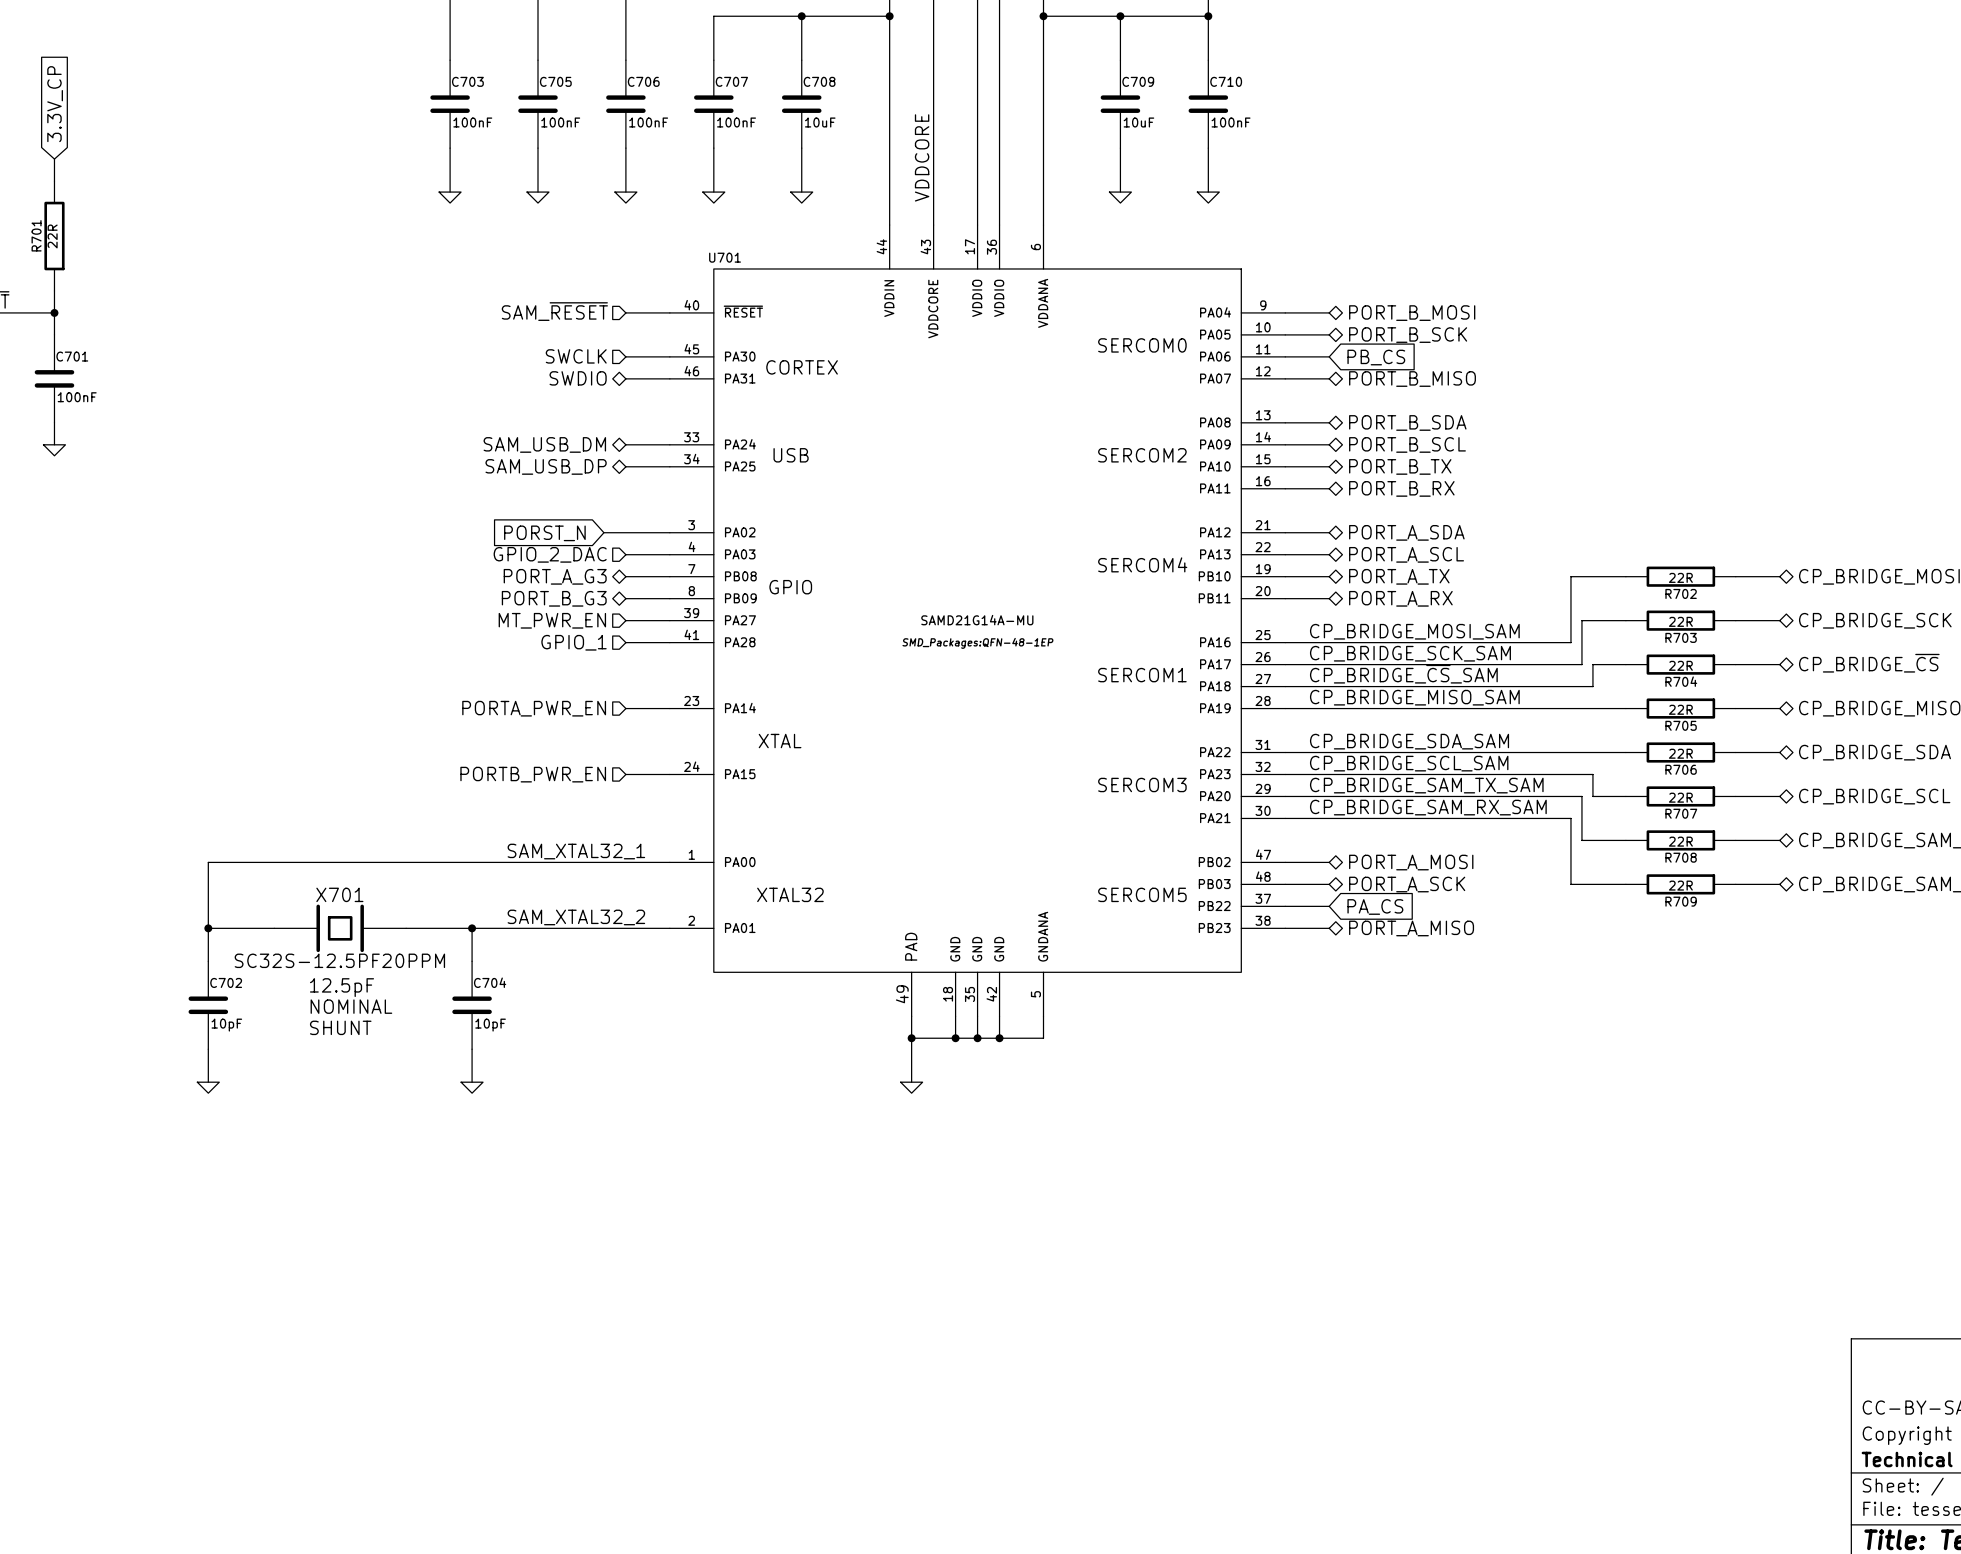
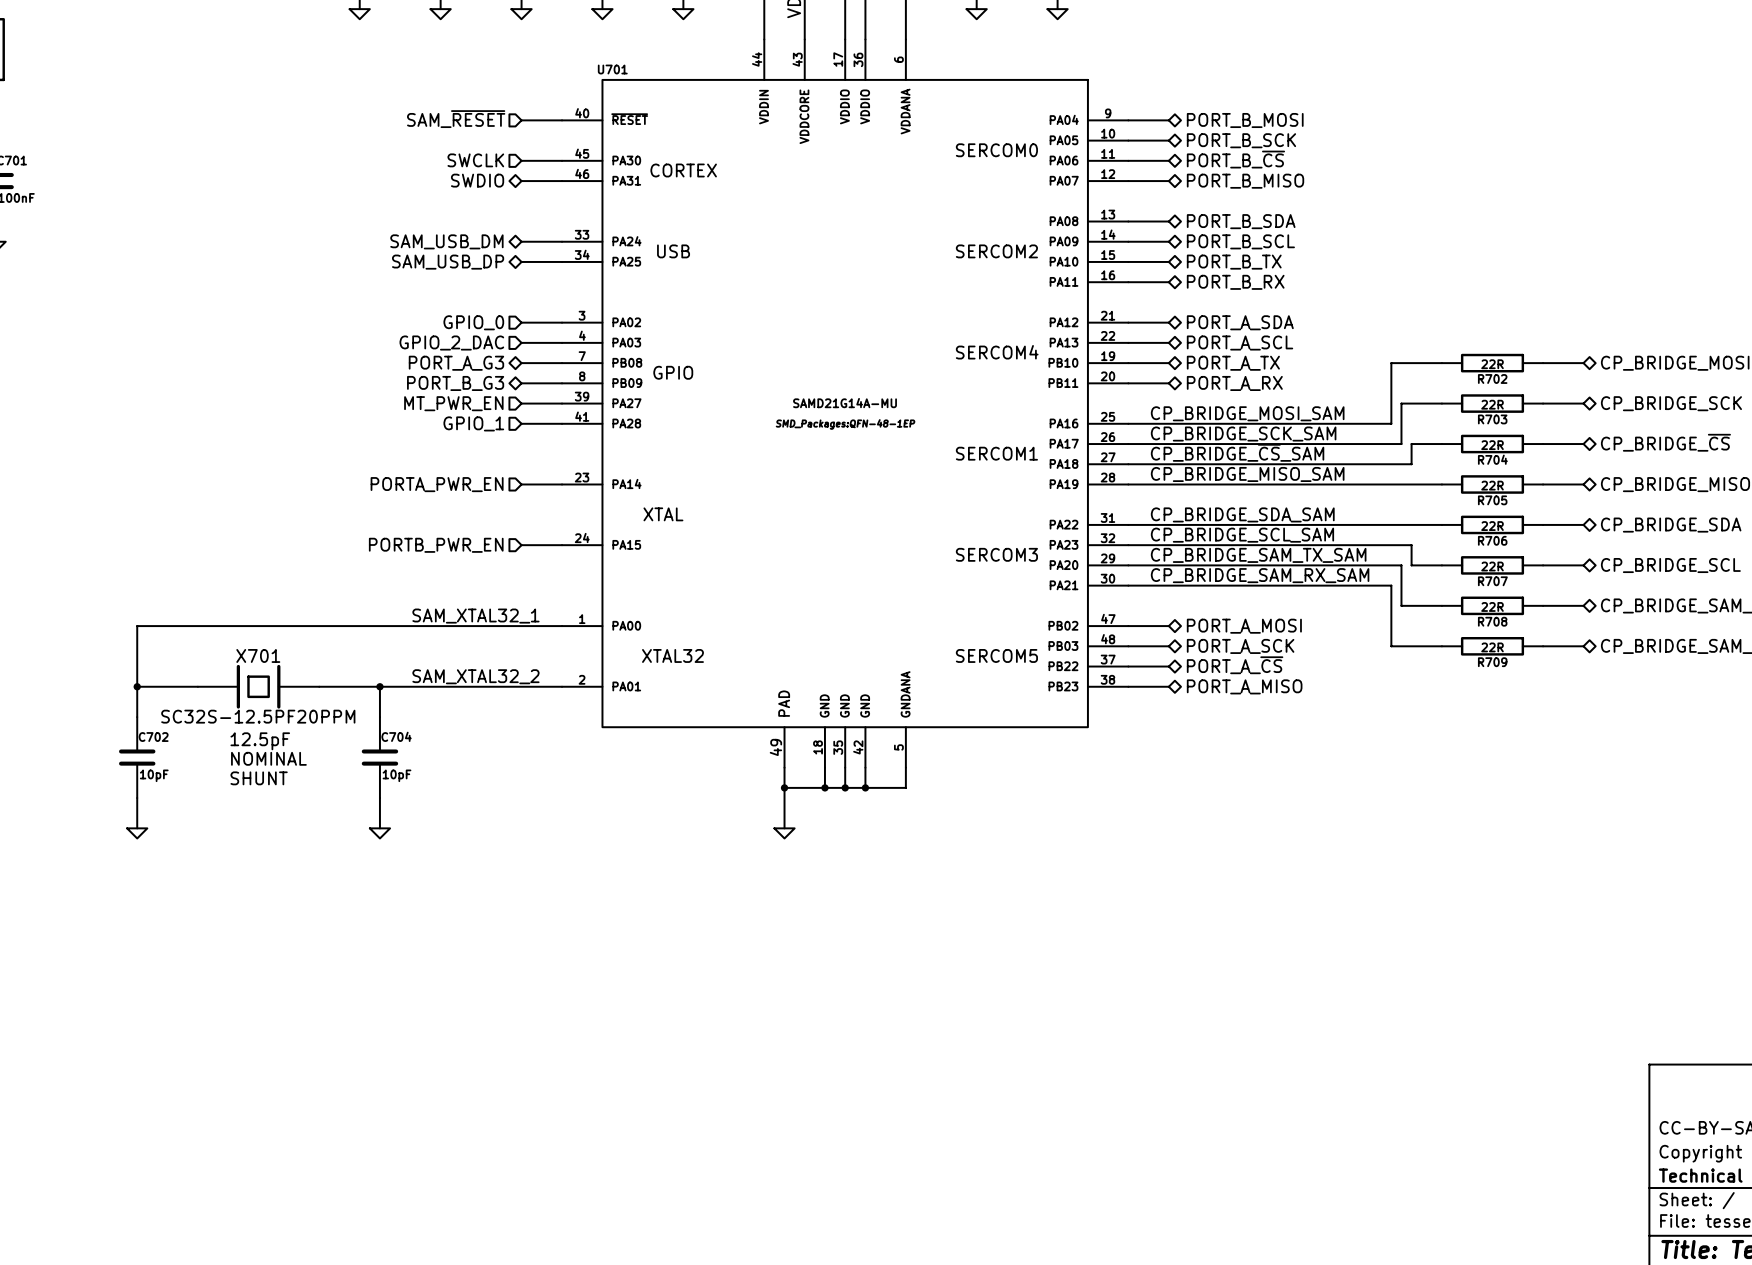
hierarchical label: none -> PORT_B_~{CS} (1235, 159)
global label: PB_CS (1376, 357) -> none
hierarchical label: none -> GPIO_0 (473, 322)
wire: (603, 532) (625, 532) -> none
global label: PORST_N (544, 533) -> none
hierarchical label: none -> PORT_A_~{CS} (1235, 665)
global label: PA_CS (1375, 906) -> none

